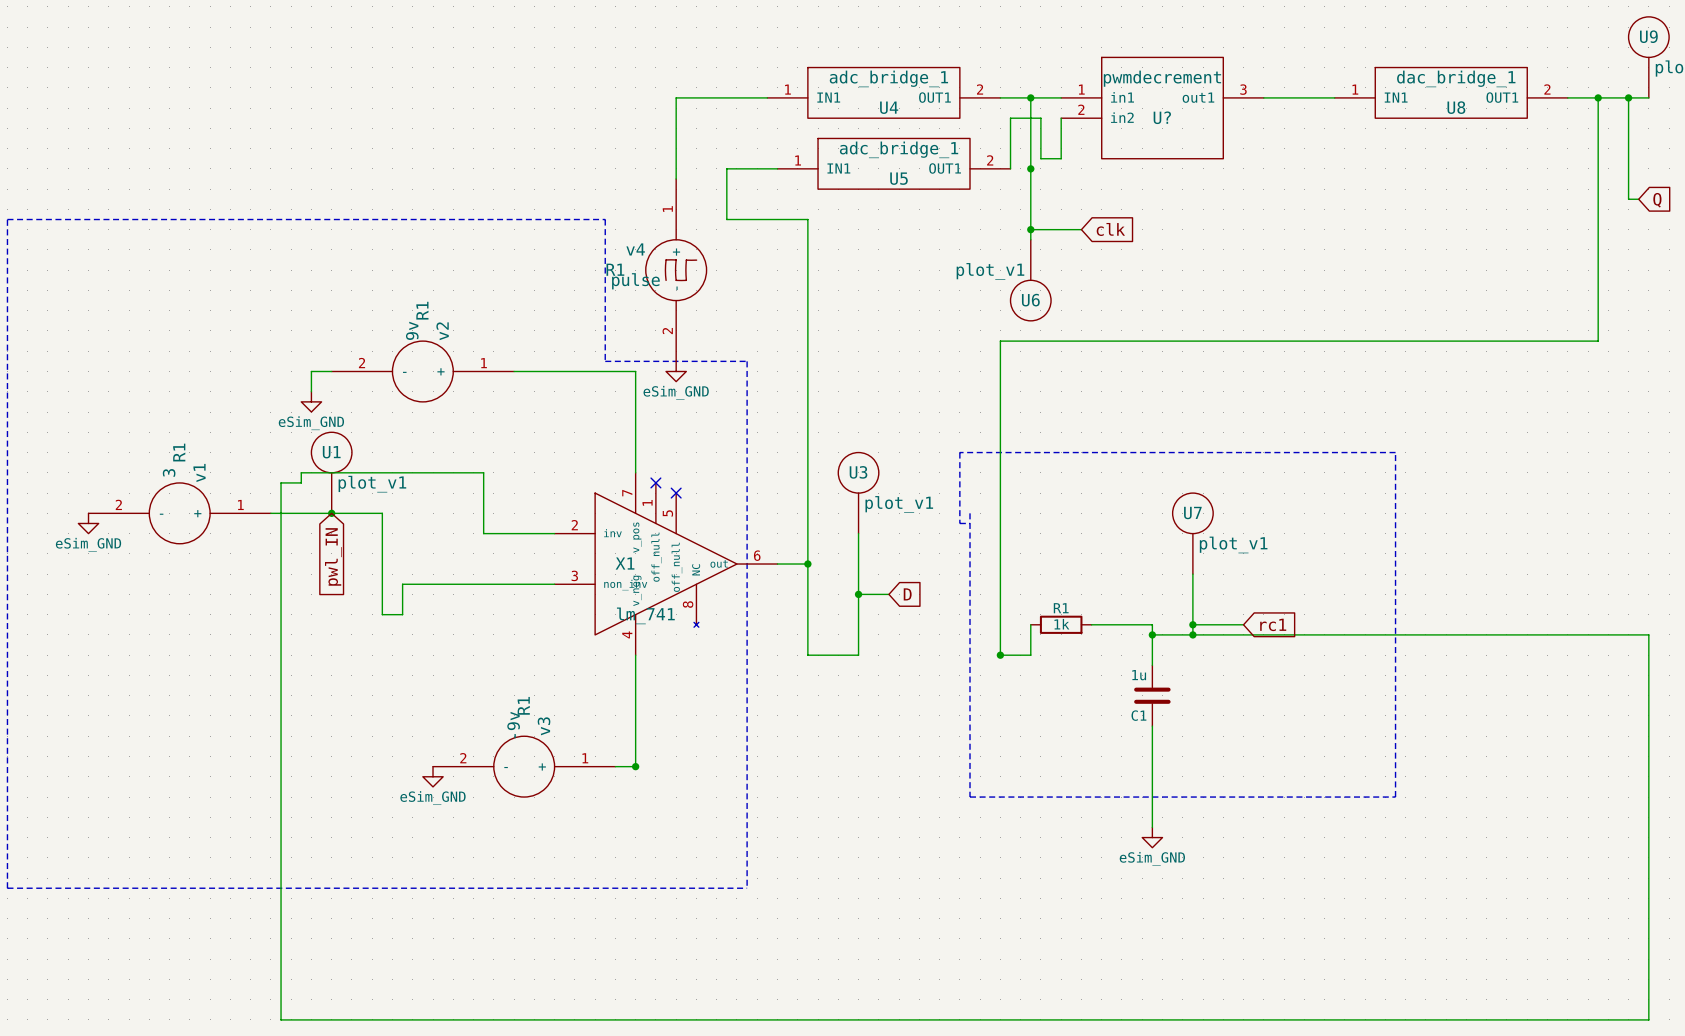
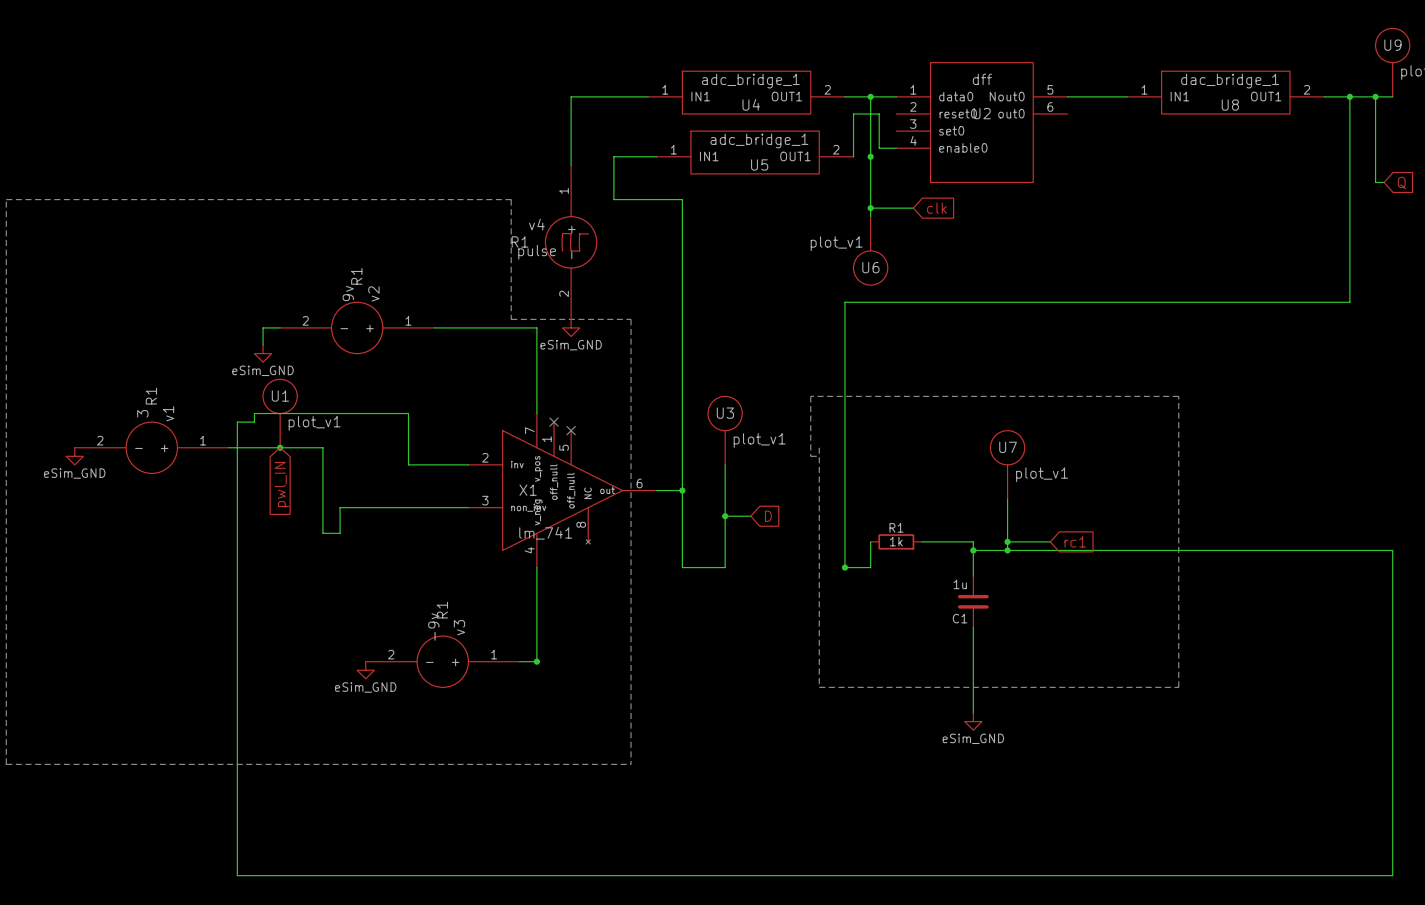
U?: pwmdecrement (1162, 108) -> none
wire: (1061, 118) (1061, 158) -> none
U2: none -> dff (981, 122)

